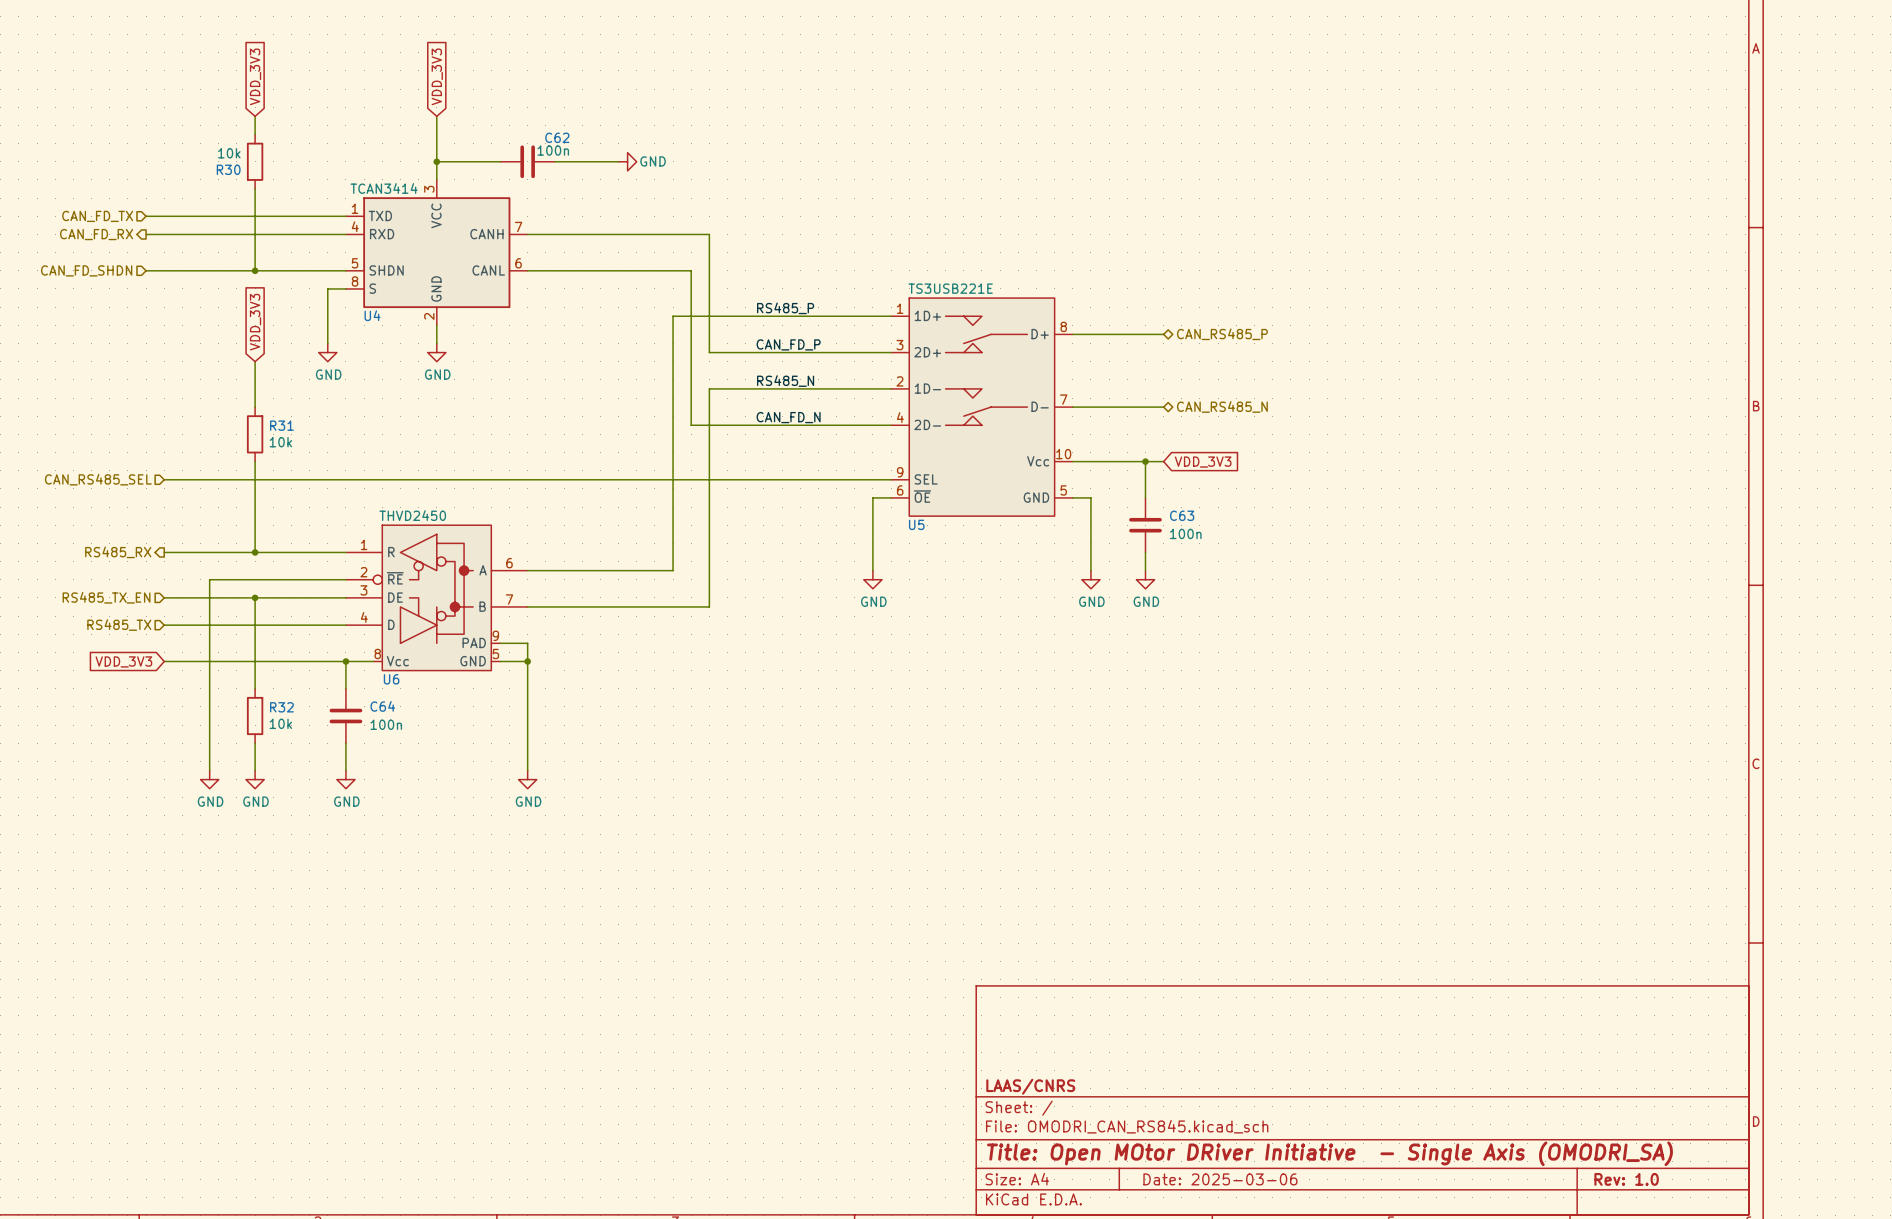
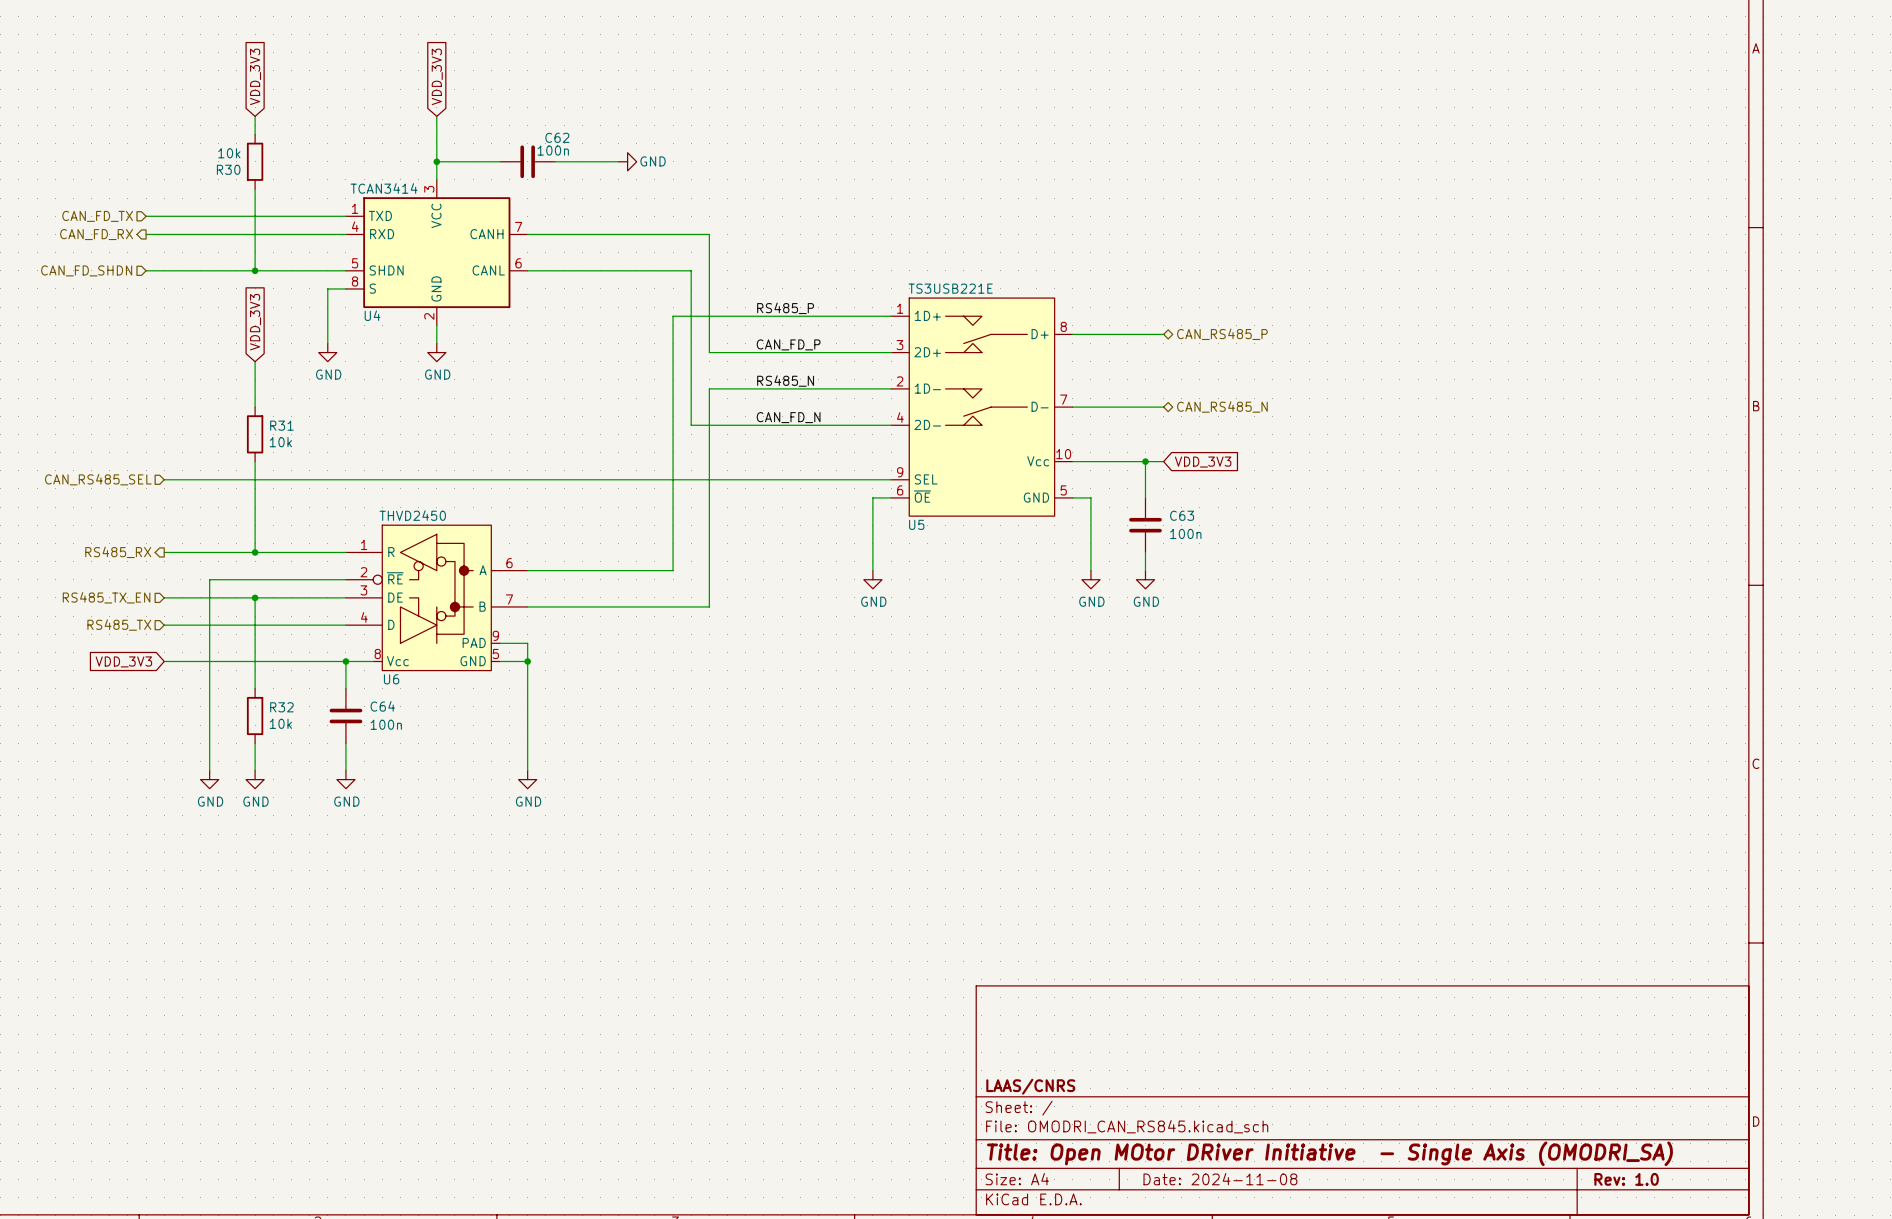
title block: Date: 2025-03-06 (1220, 1179) -> Date: 2024-11-08 (1220, 1179)

